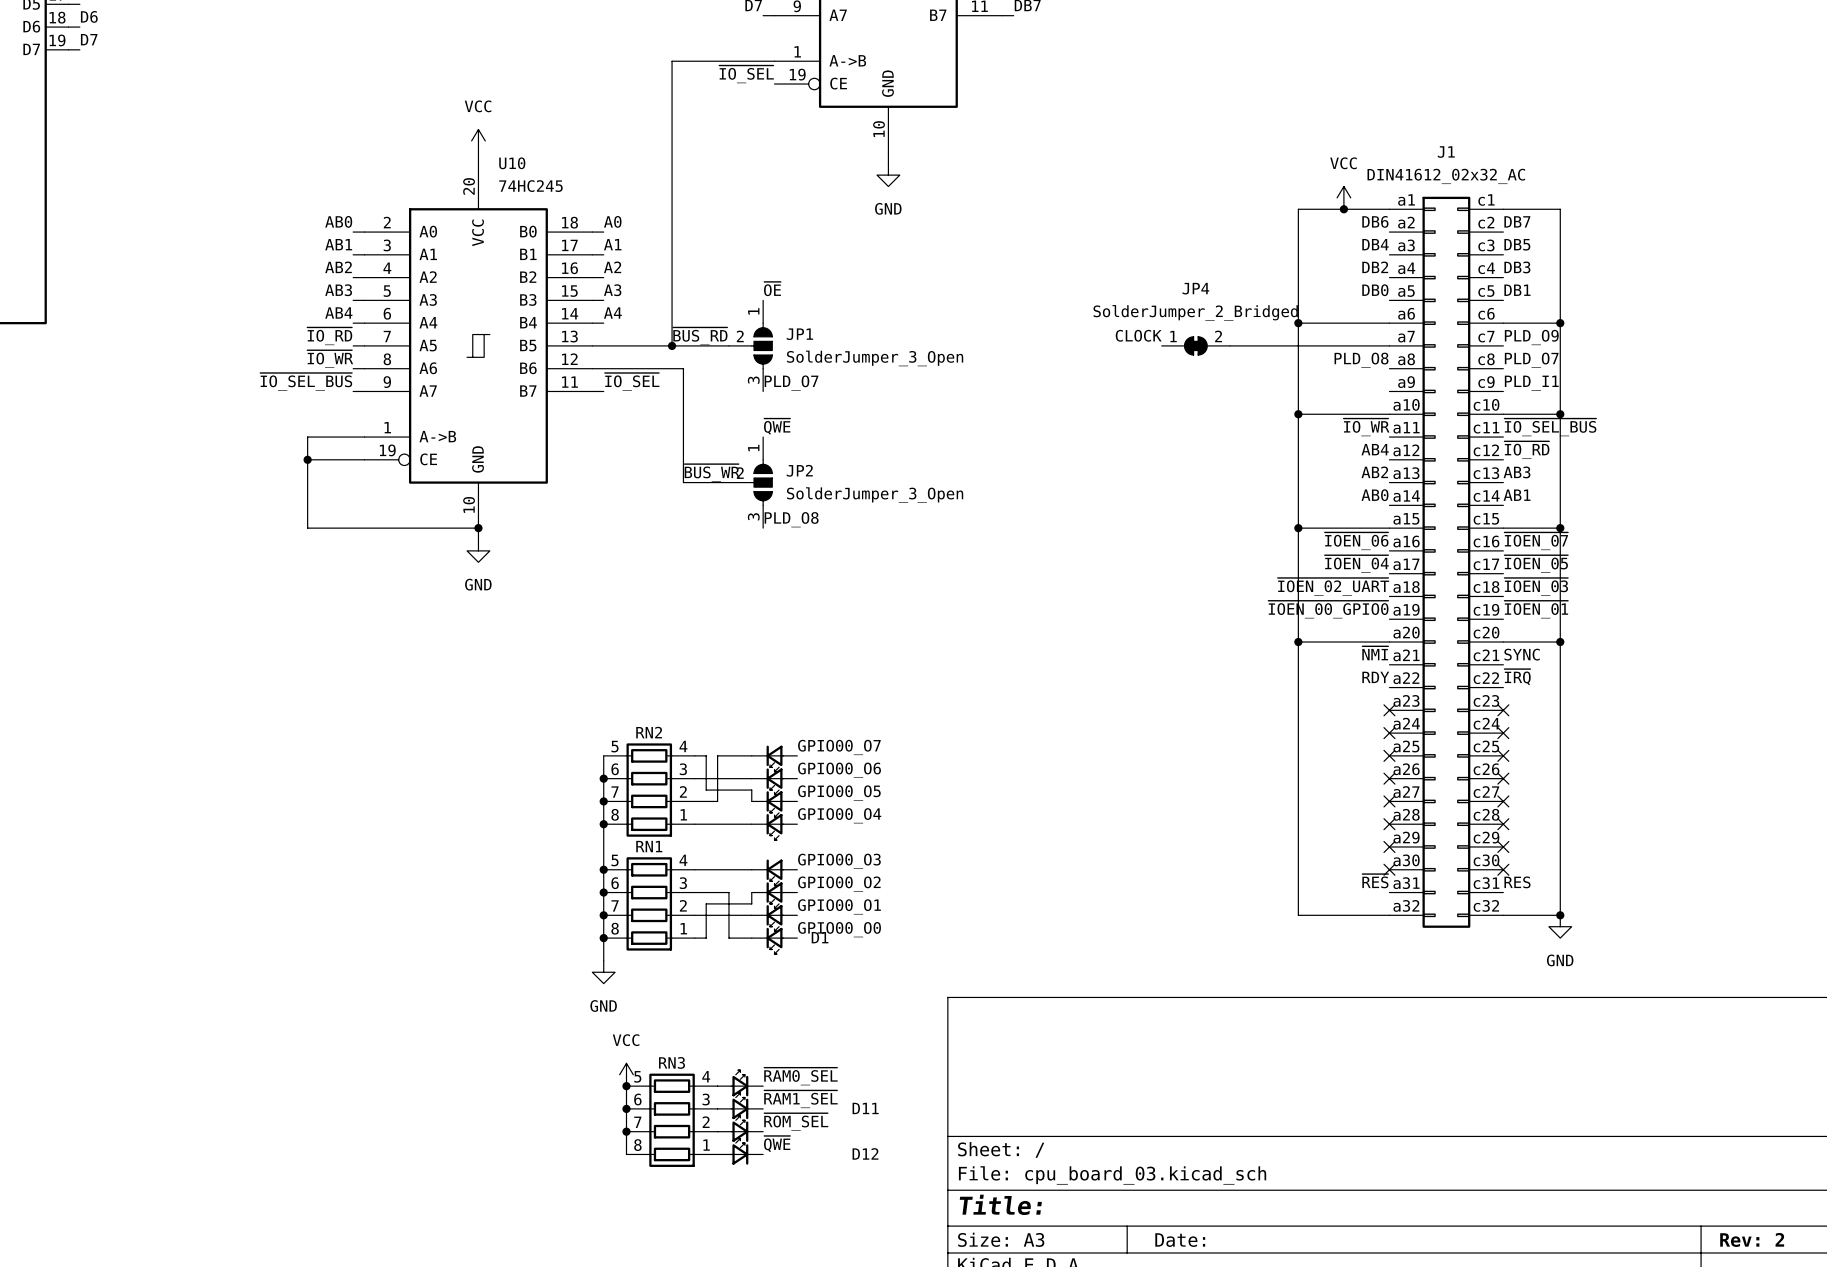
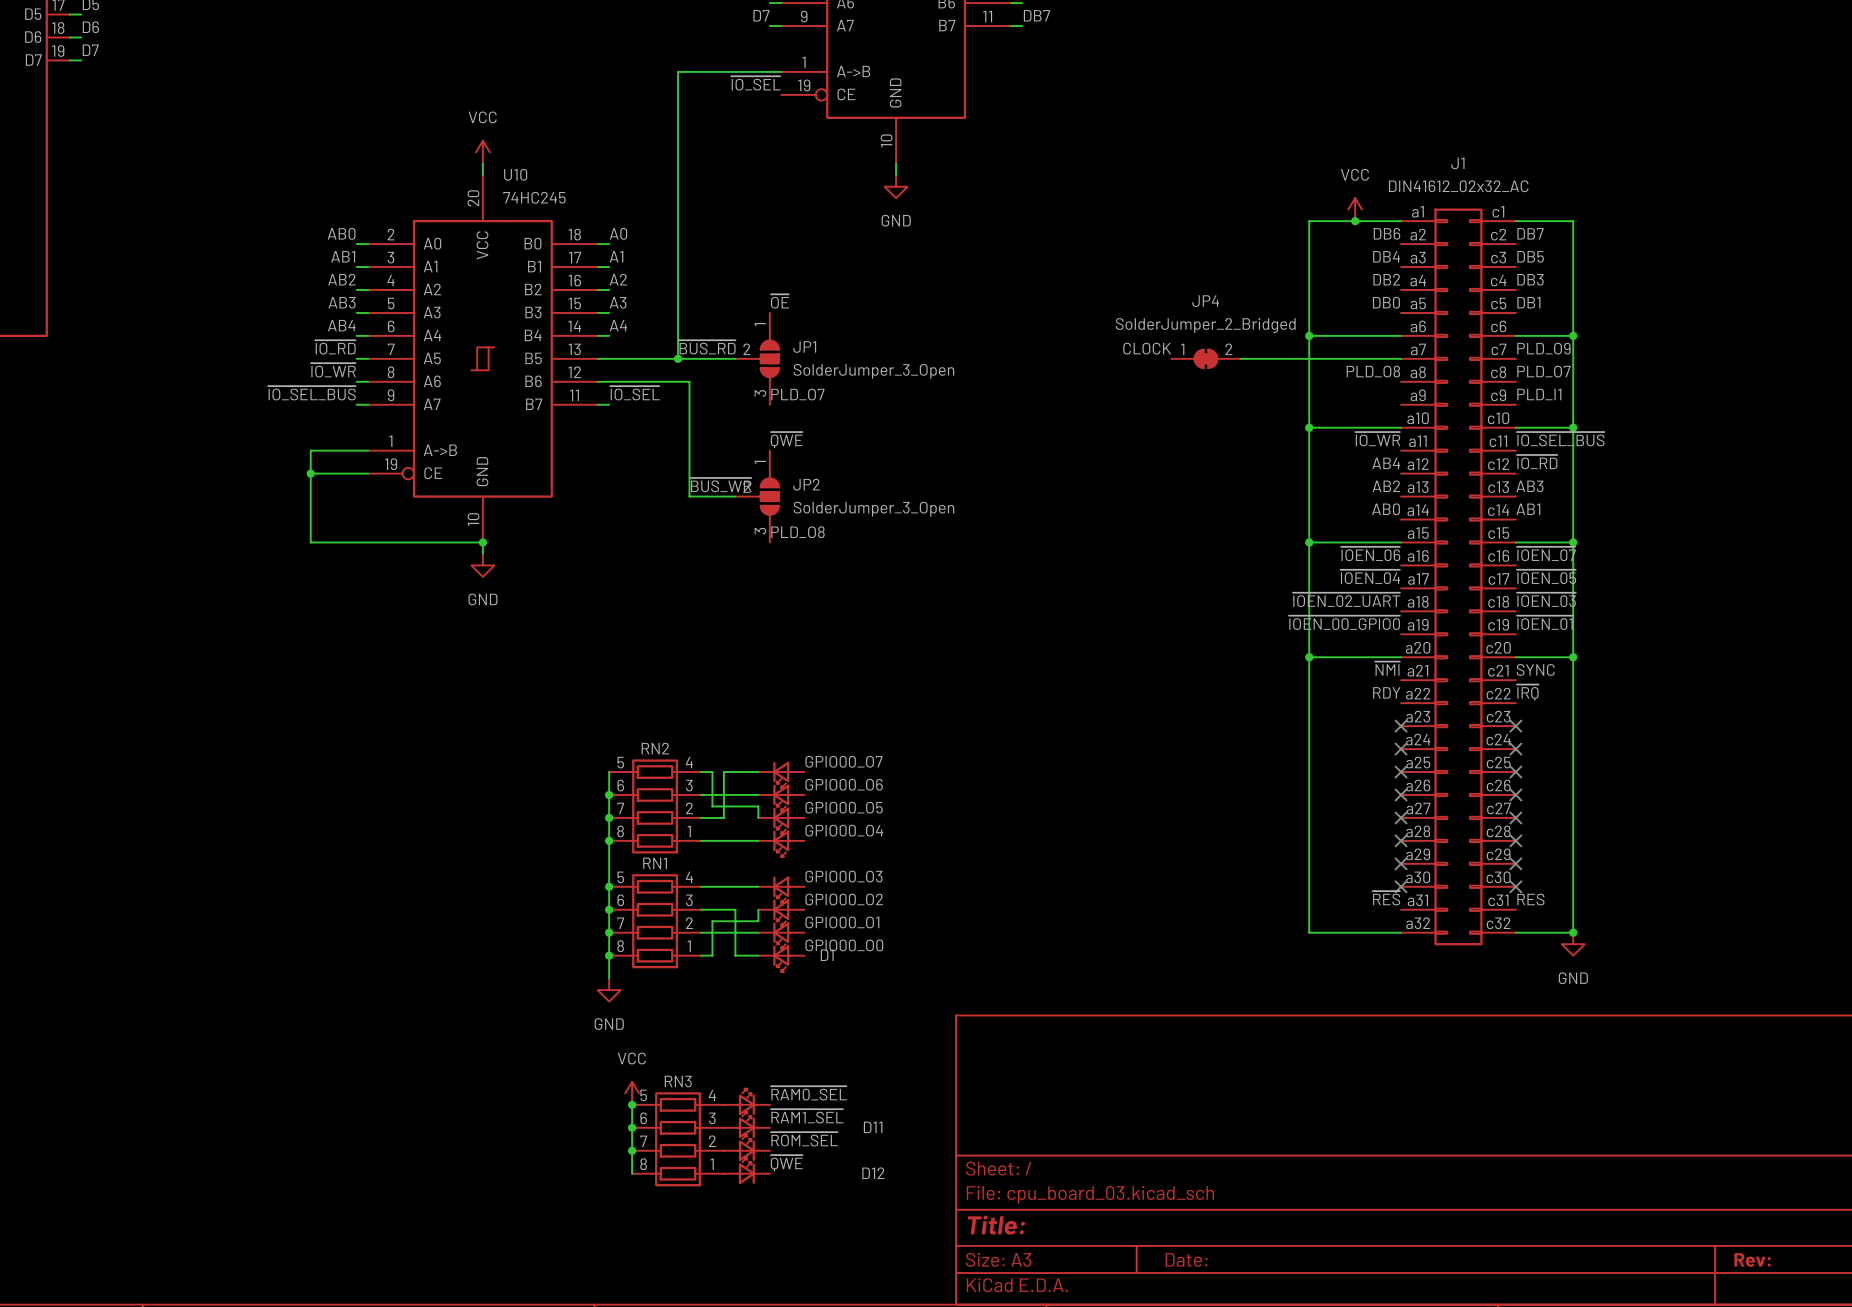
title block: Rev: 2 (1752, 1239) -> Rev: (1752, 1259)

